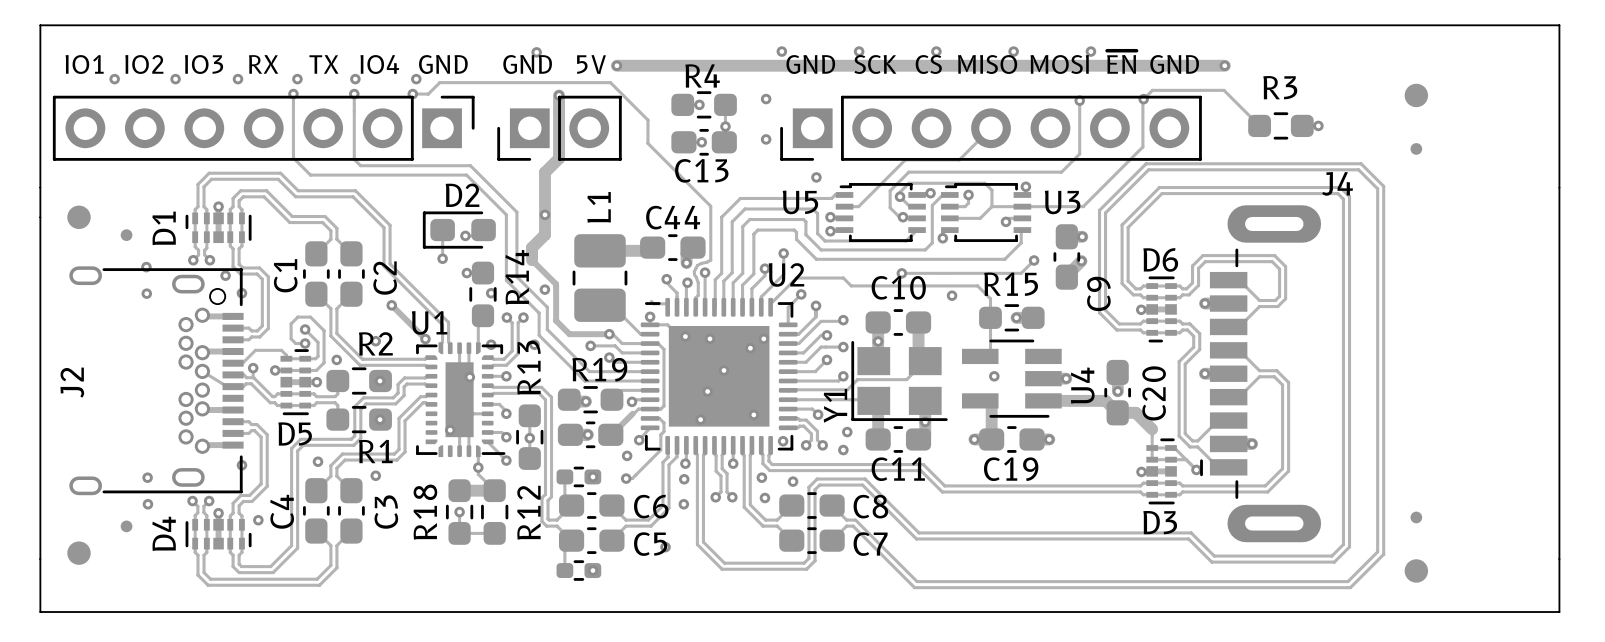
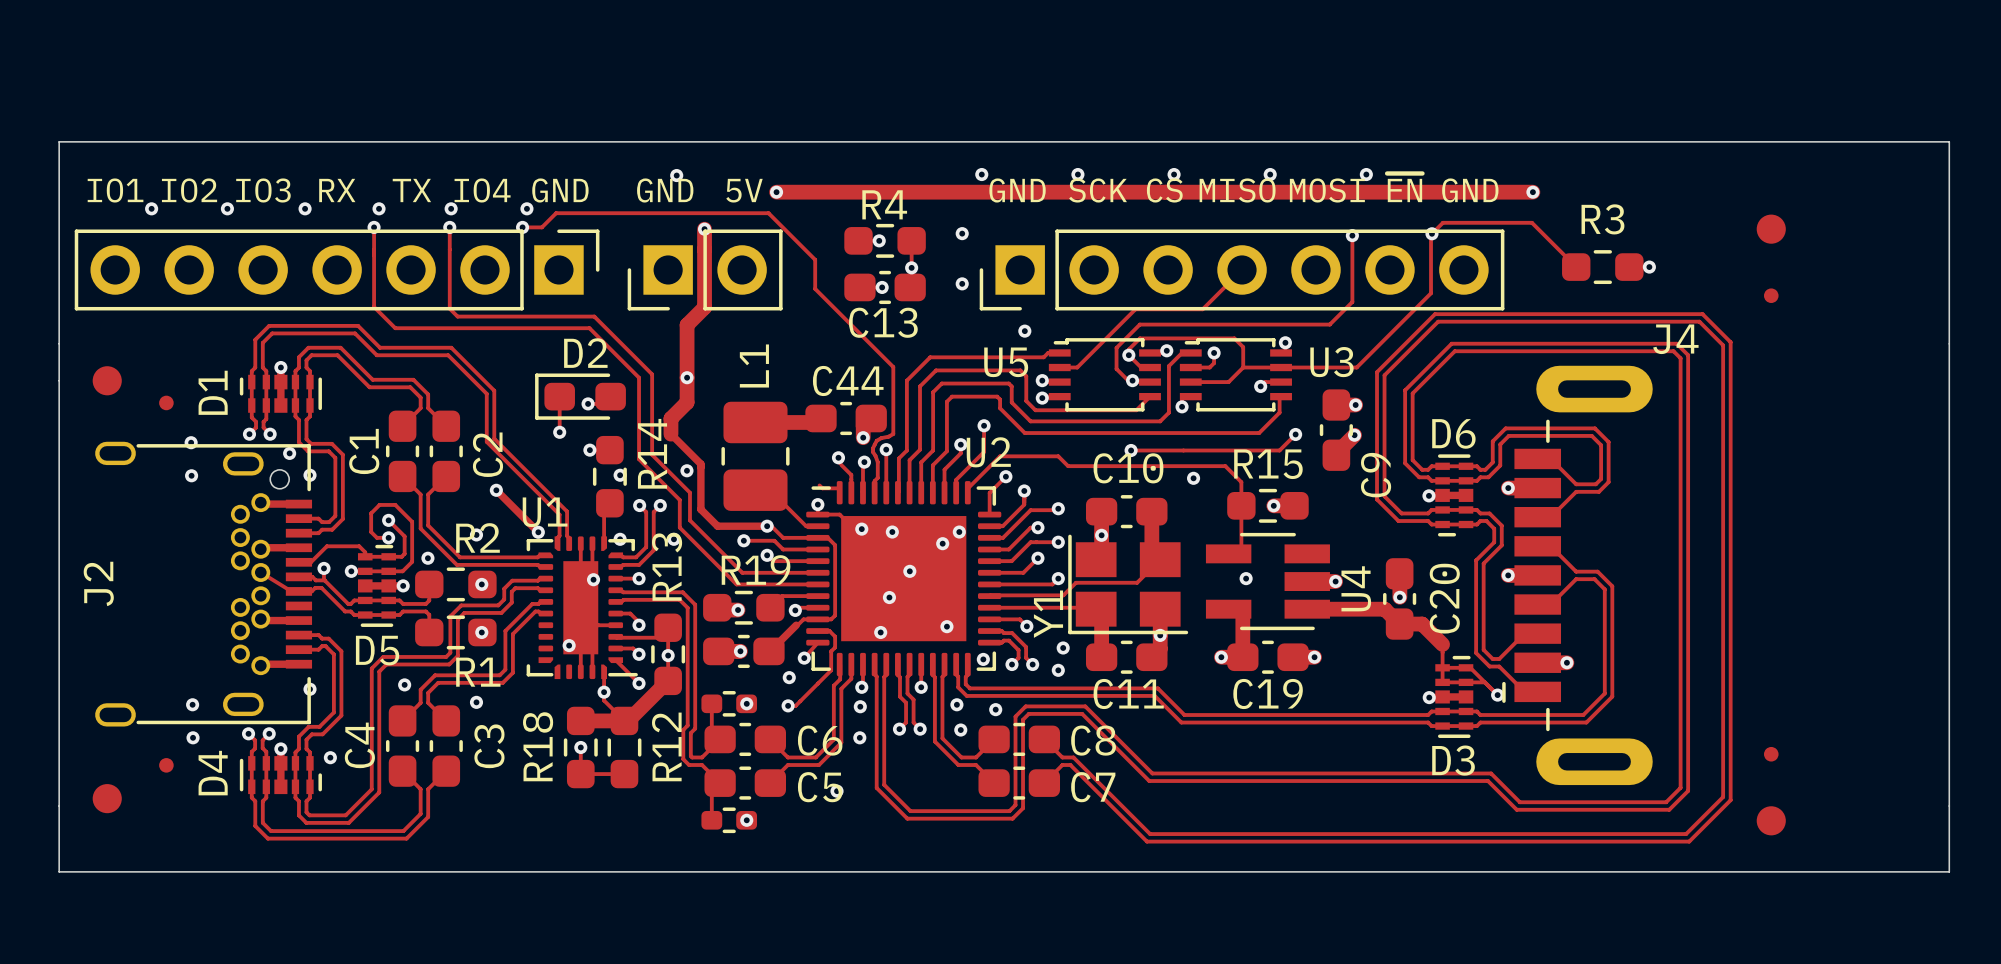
track: none -> (616, 637) (658, 637)
track: none -> (668, 680) (628, 720)

